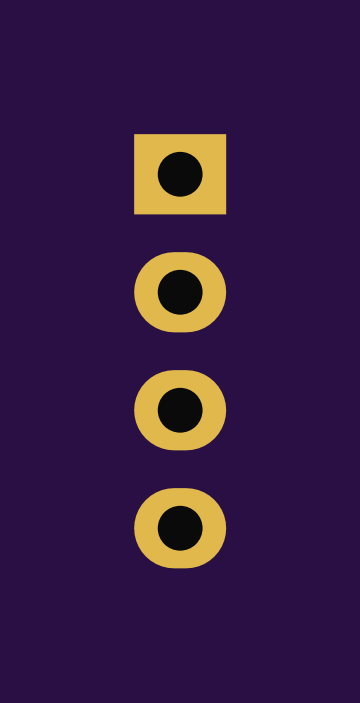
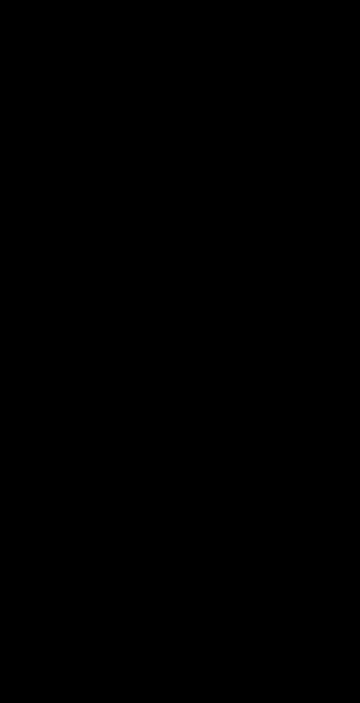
part: (180, 351) -> none

